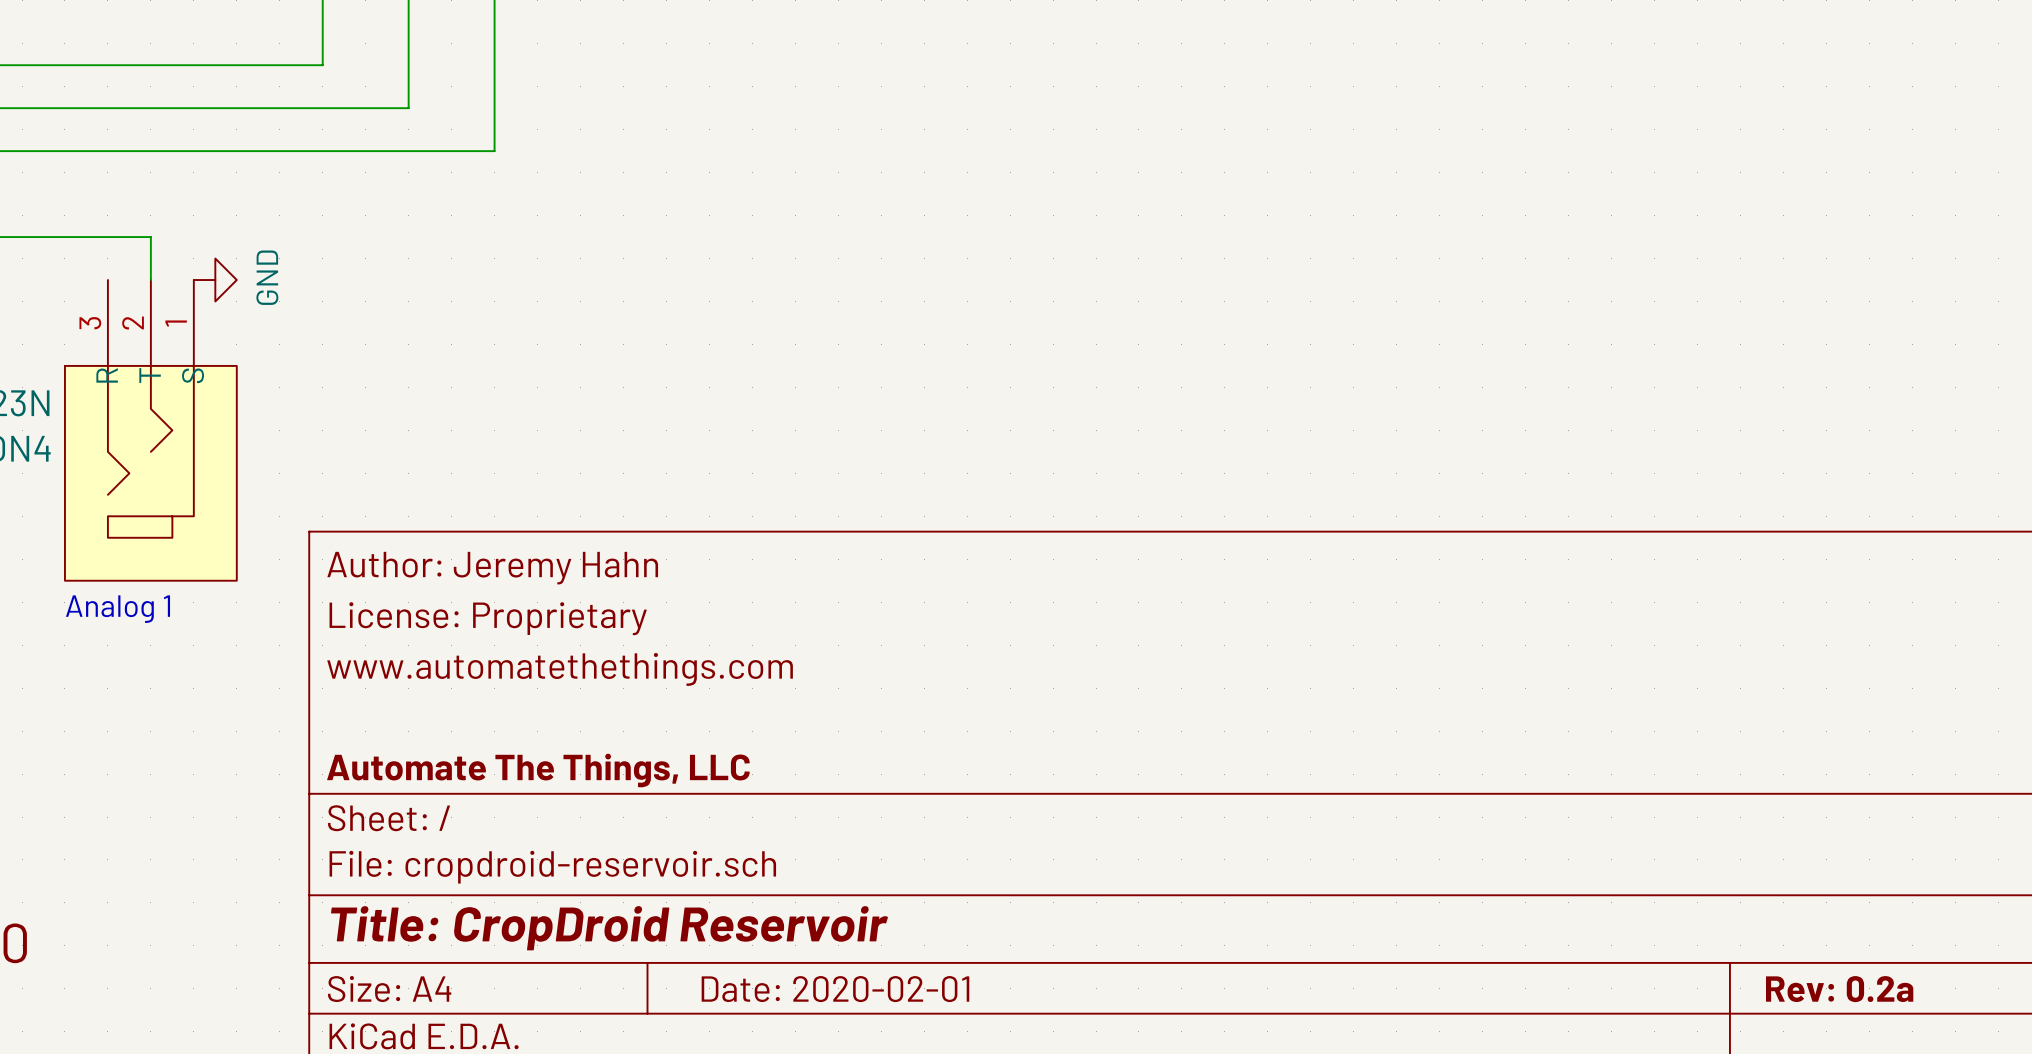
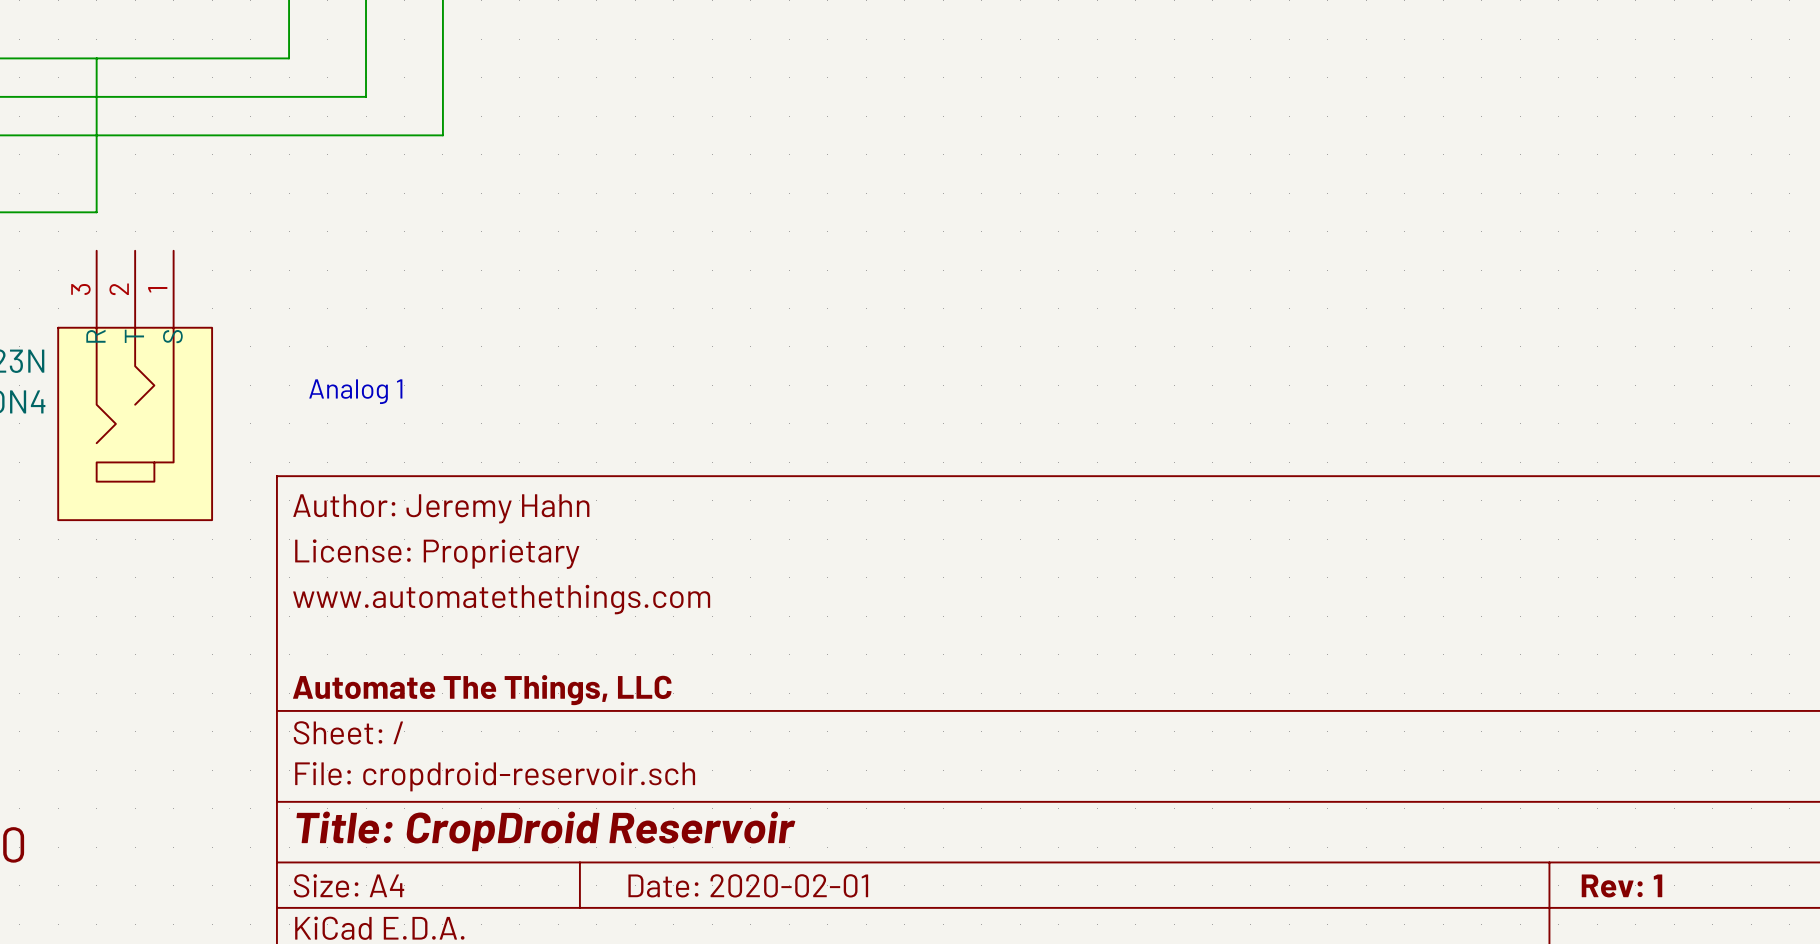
wire: (107, 237) (150, 237) (150, 280) -> (96, 212) (96, 58)
power symbol: GND (215, 280) -> none
text position: Analog 1 (118, 609) -> Analog 1 (355, 391)
title block: Rev: 0.2a (1839, 989) -> Rev: 1 (1621, 885)

